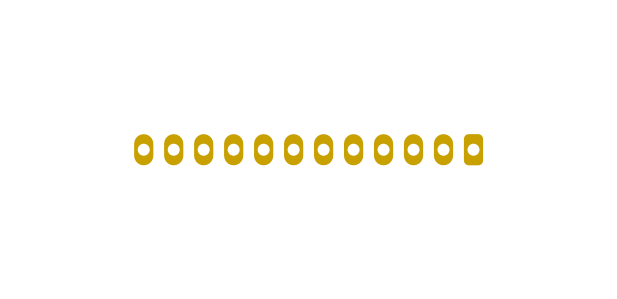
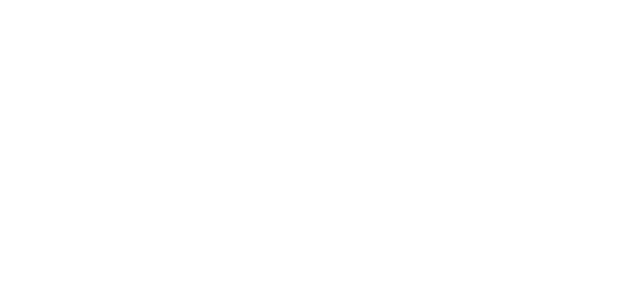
part: (308, 149) -> none

